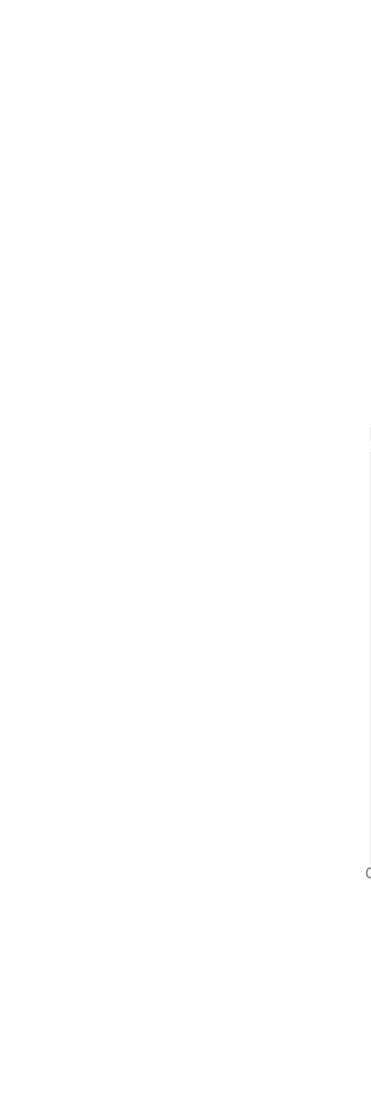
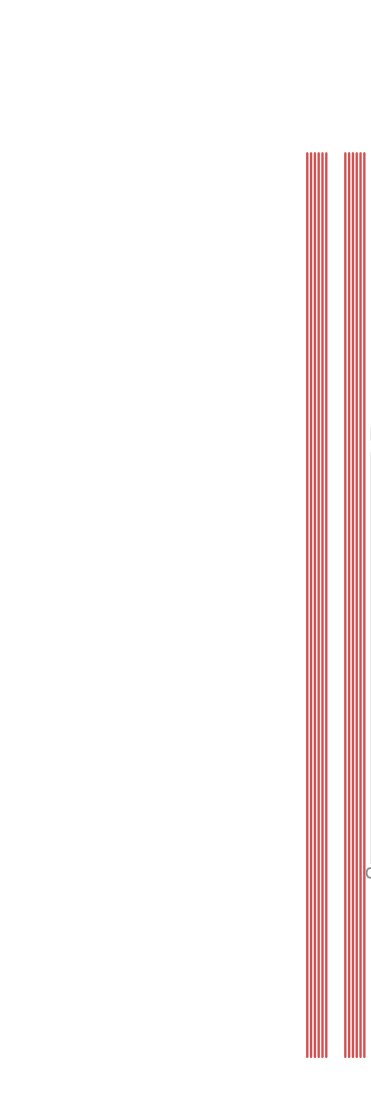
top track: none -> (307, 153) (307, 1056)
top track: none -> (311, 153) (311, 1056)
top track: none -> (314, 153) (314, 1056)
top track: none -> (318, 153) (318, 1056)
top track: none -> (322, 153) (322, 1056)
top track: none -> (326, 153) (326, 1056)
top track: none -> (345, 153) (345, 1056)
top track: none -> (349, 153) (349, 1056)
top track: none -> (352, 153) (352, 1056)
top track: none -> (356, 153) (356, 1056)
top track: none -> (360, 153) (360, 1056)
top track: none -> (364, 153) (364, 1056)

